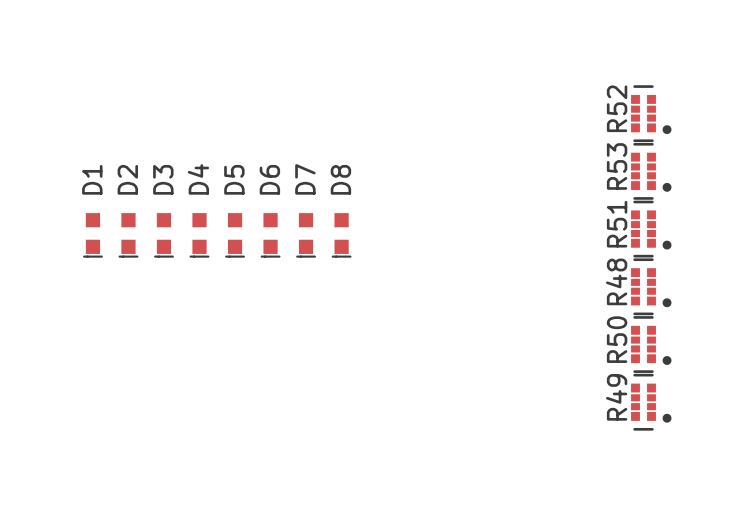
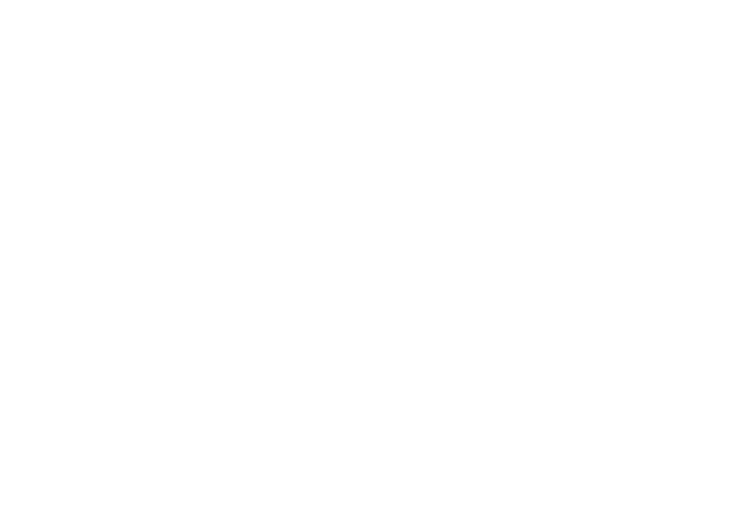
R52: (651, 113) -> none
R53: (651, 171) -> none
R51: (651, 229) -> none
D1: (92, 235) -> none
D2: (128, 235) -> none
D3: (163, 235) -> none
D4: (199, 235) -> none
D5: (235, 235) -> none
D6: (270, 235) -> none
D7: (306, 235) -> none
D8: (341, 235) -> none
R48: (651, 286) -> none
R50: (651, 344) -> none
R49: (651, 402) -> none

